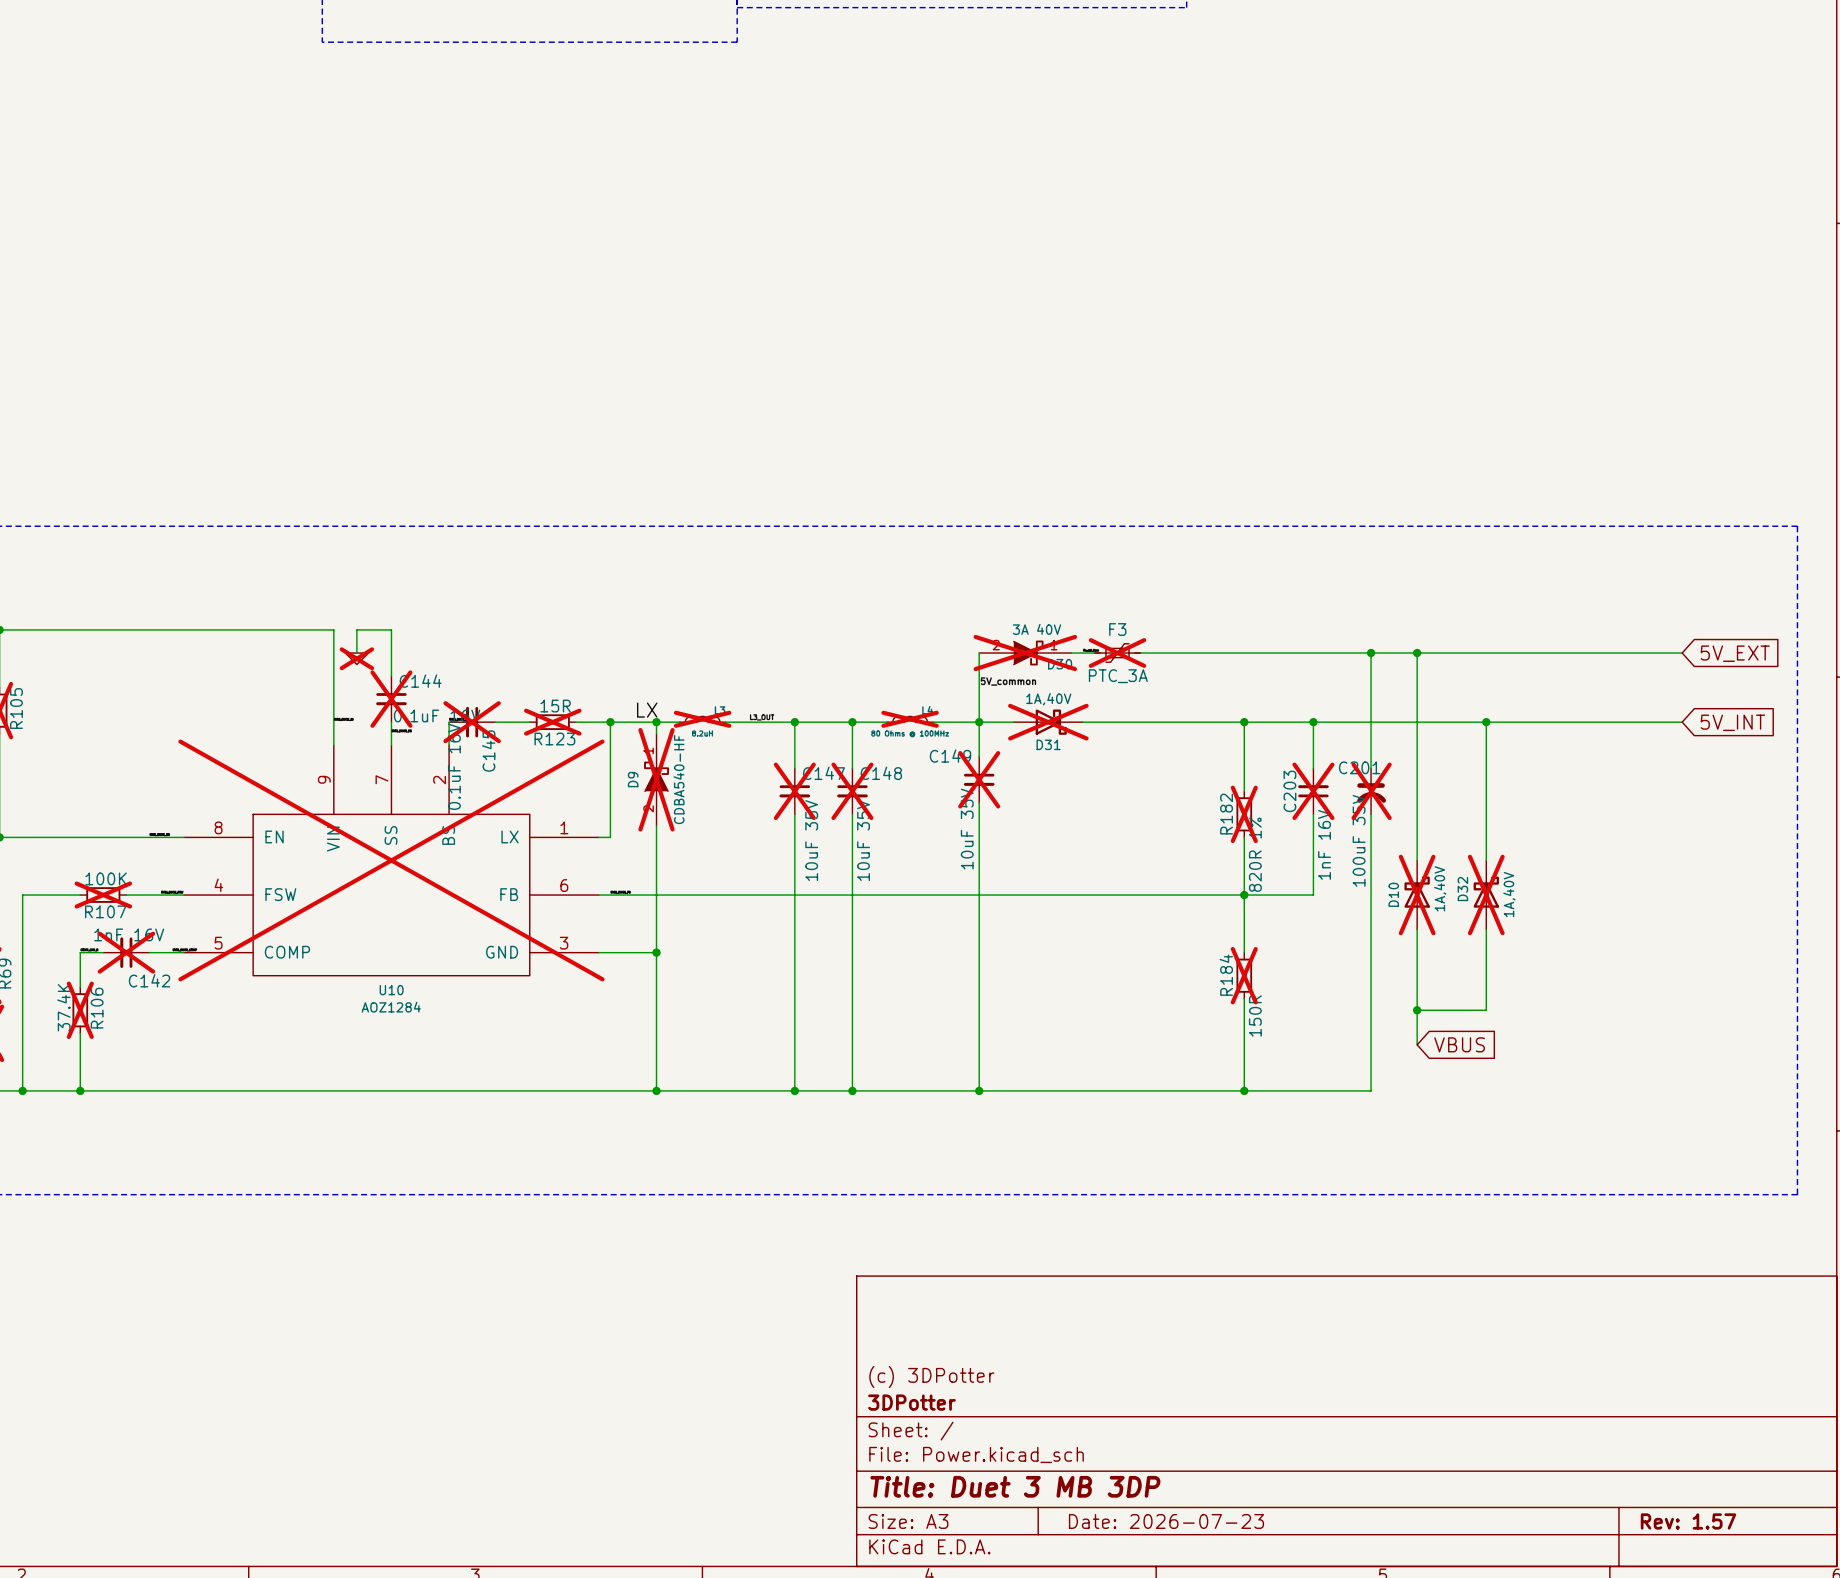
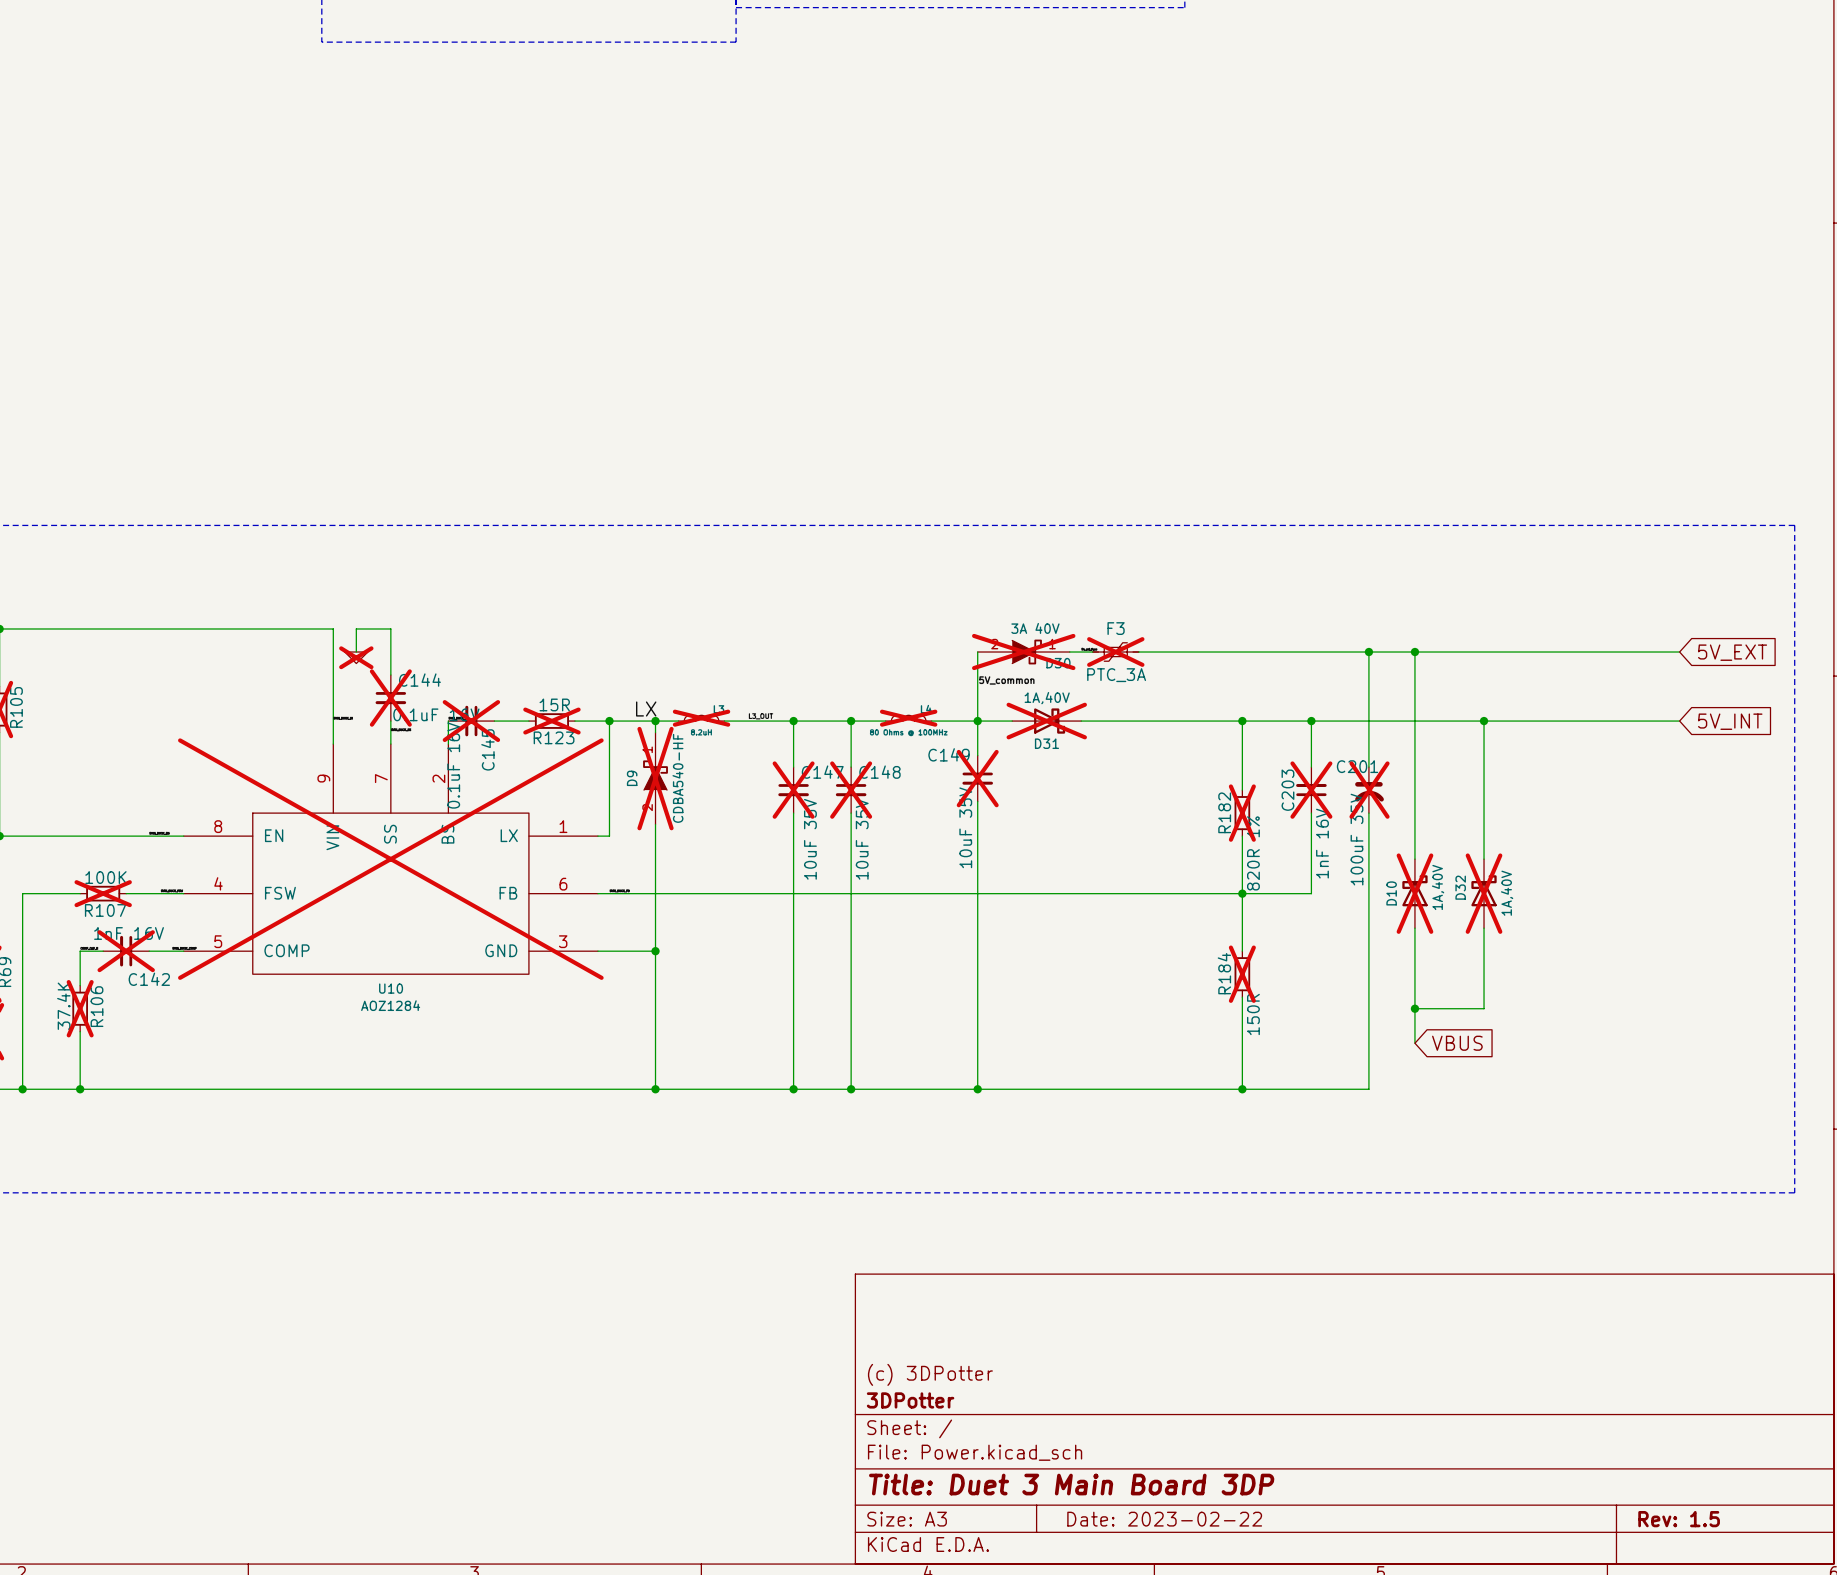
title block: Title: Duet 3 MB 3DP (1015, 1486) -> Title: Duet 3 Main Board 3DP (1071, 1484)
title block: Date: 2026-07-23 (1166, 1521) -> Date: 2023-02-22 (1164, 1519)
title block: Rev: 1.57 (1688, 1521) -> Rev: 1.5 (1679, 1519)

